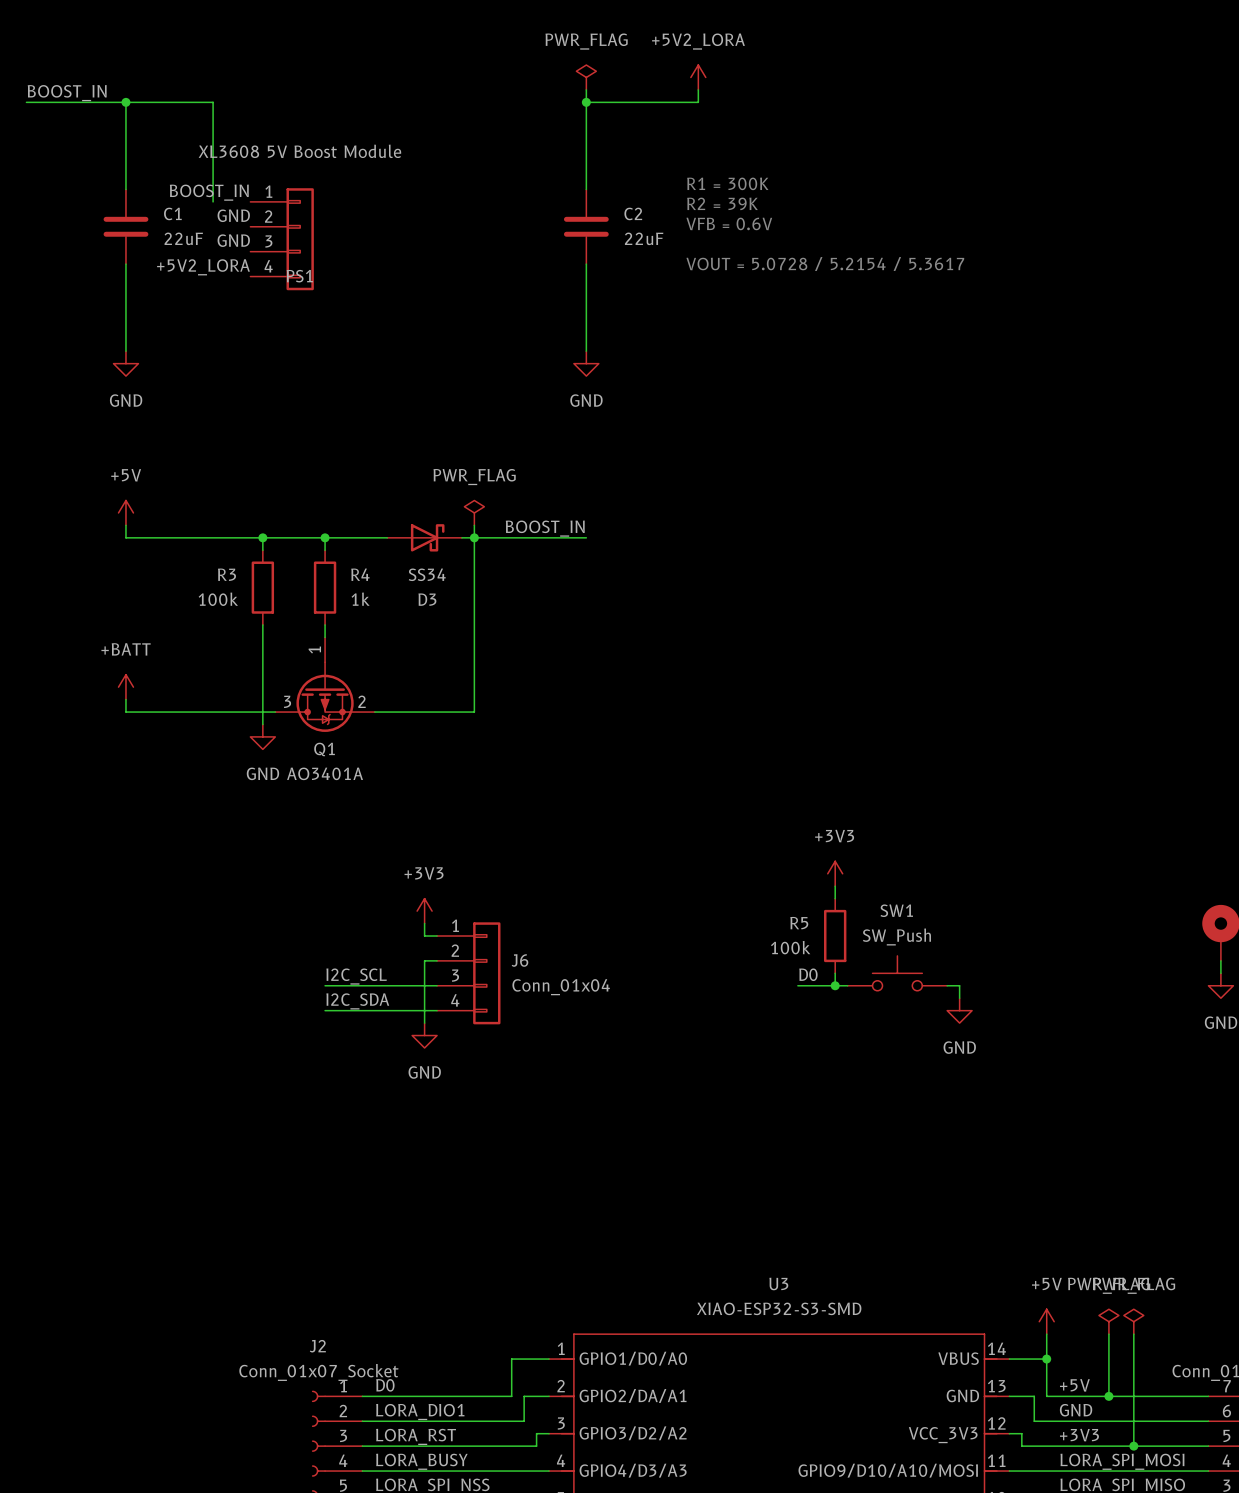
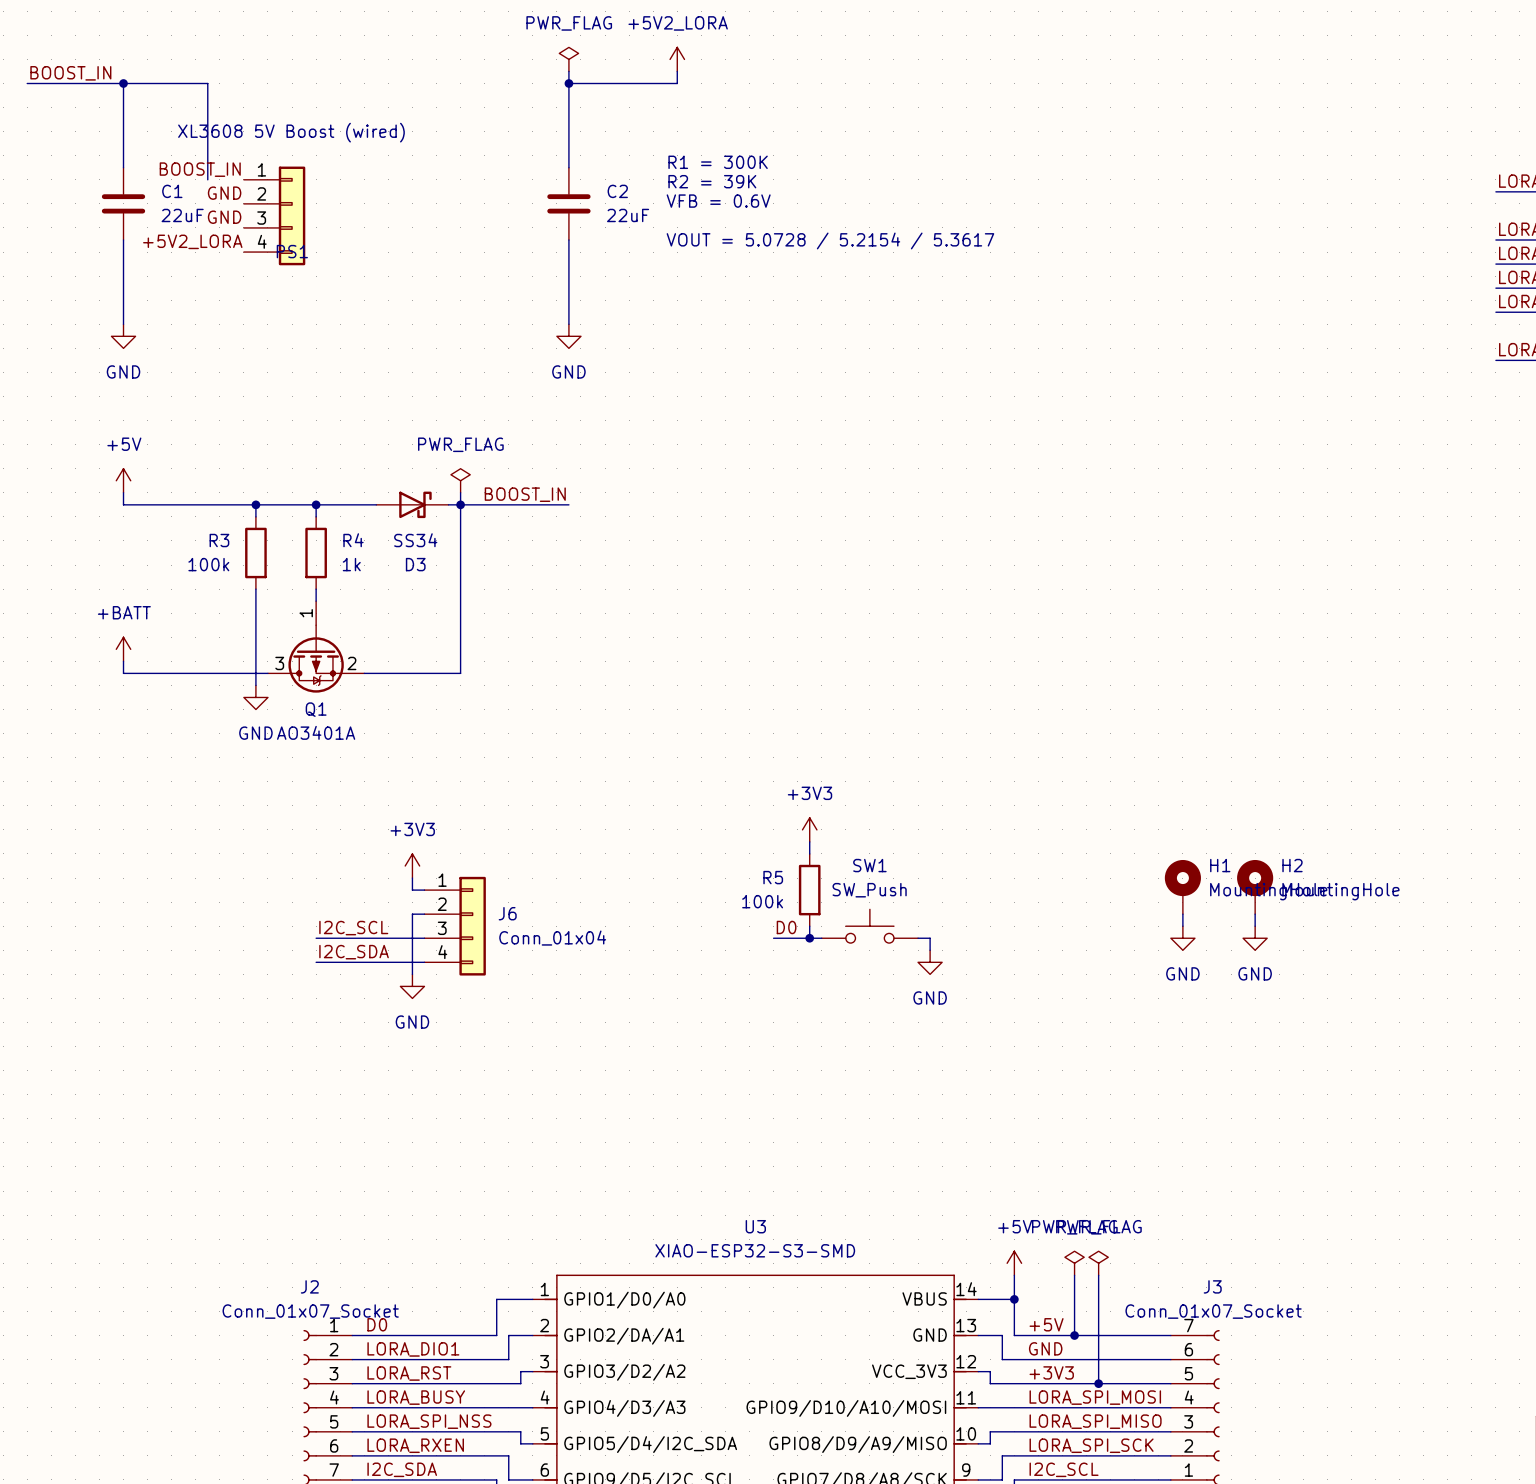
PS1 value: XL3608 5V Boost Module (299, 151) -> XL3608 5V Boost (wired) (291, 132)

